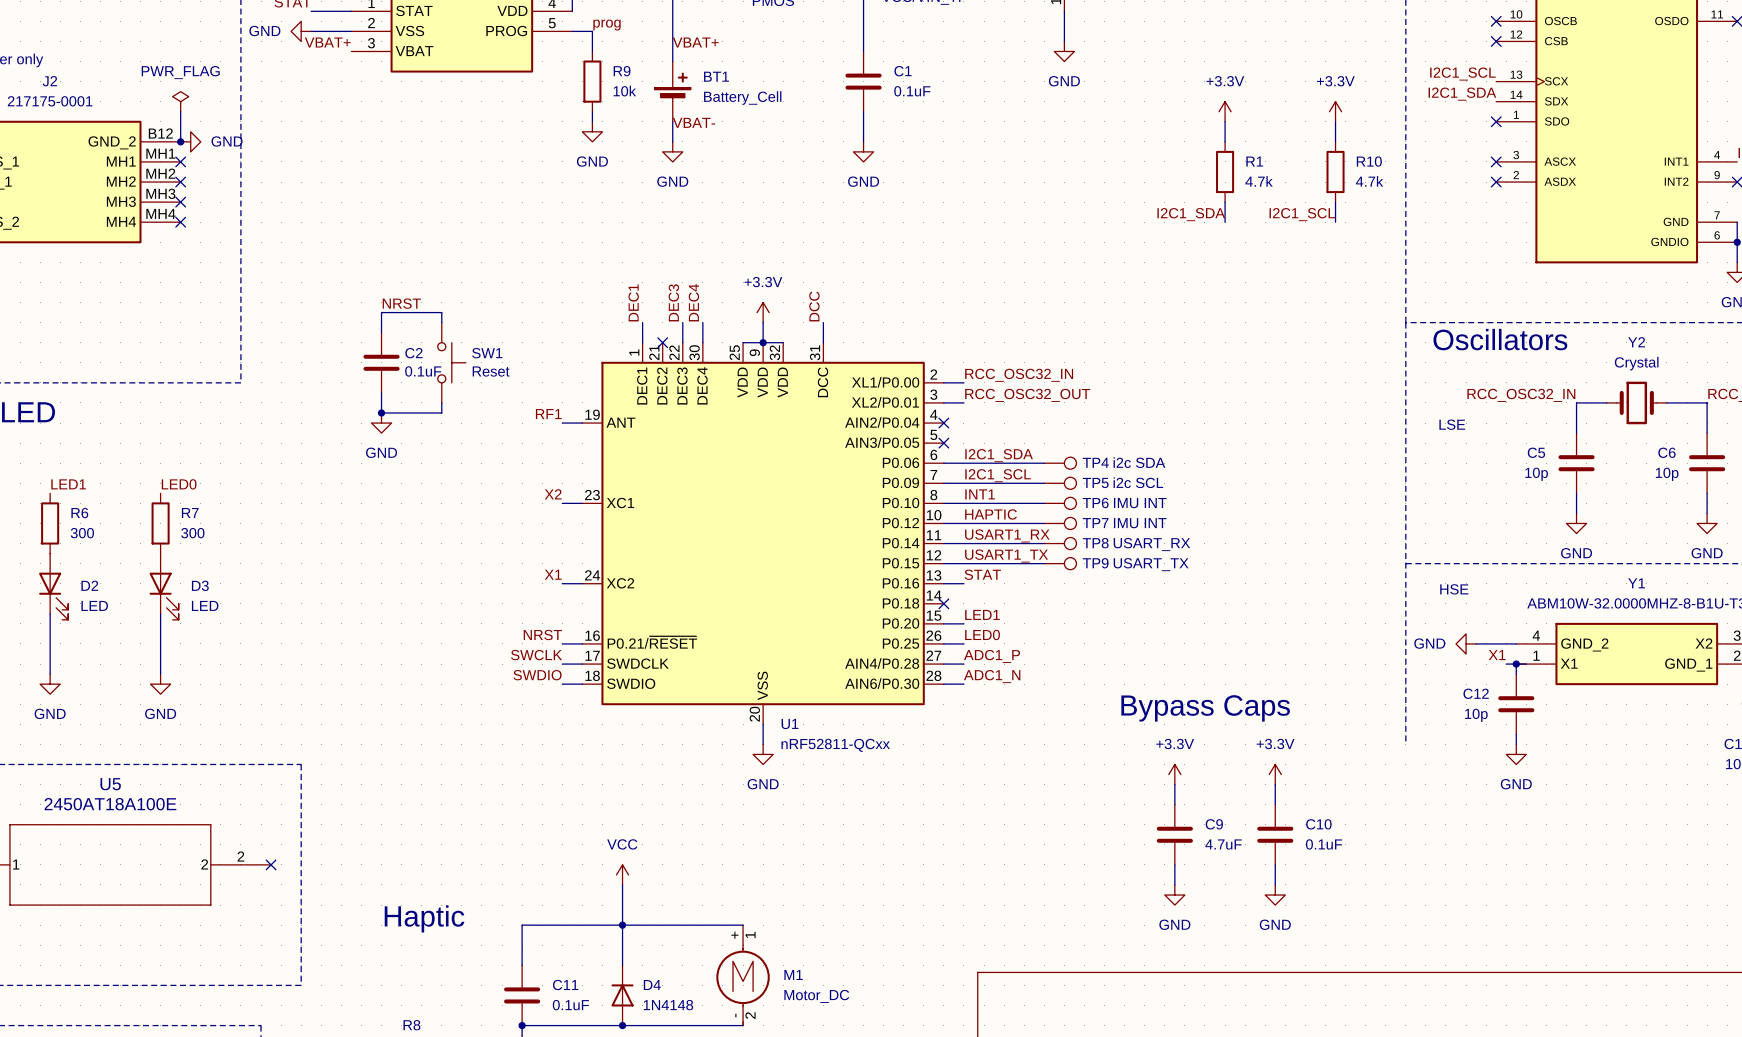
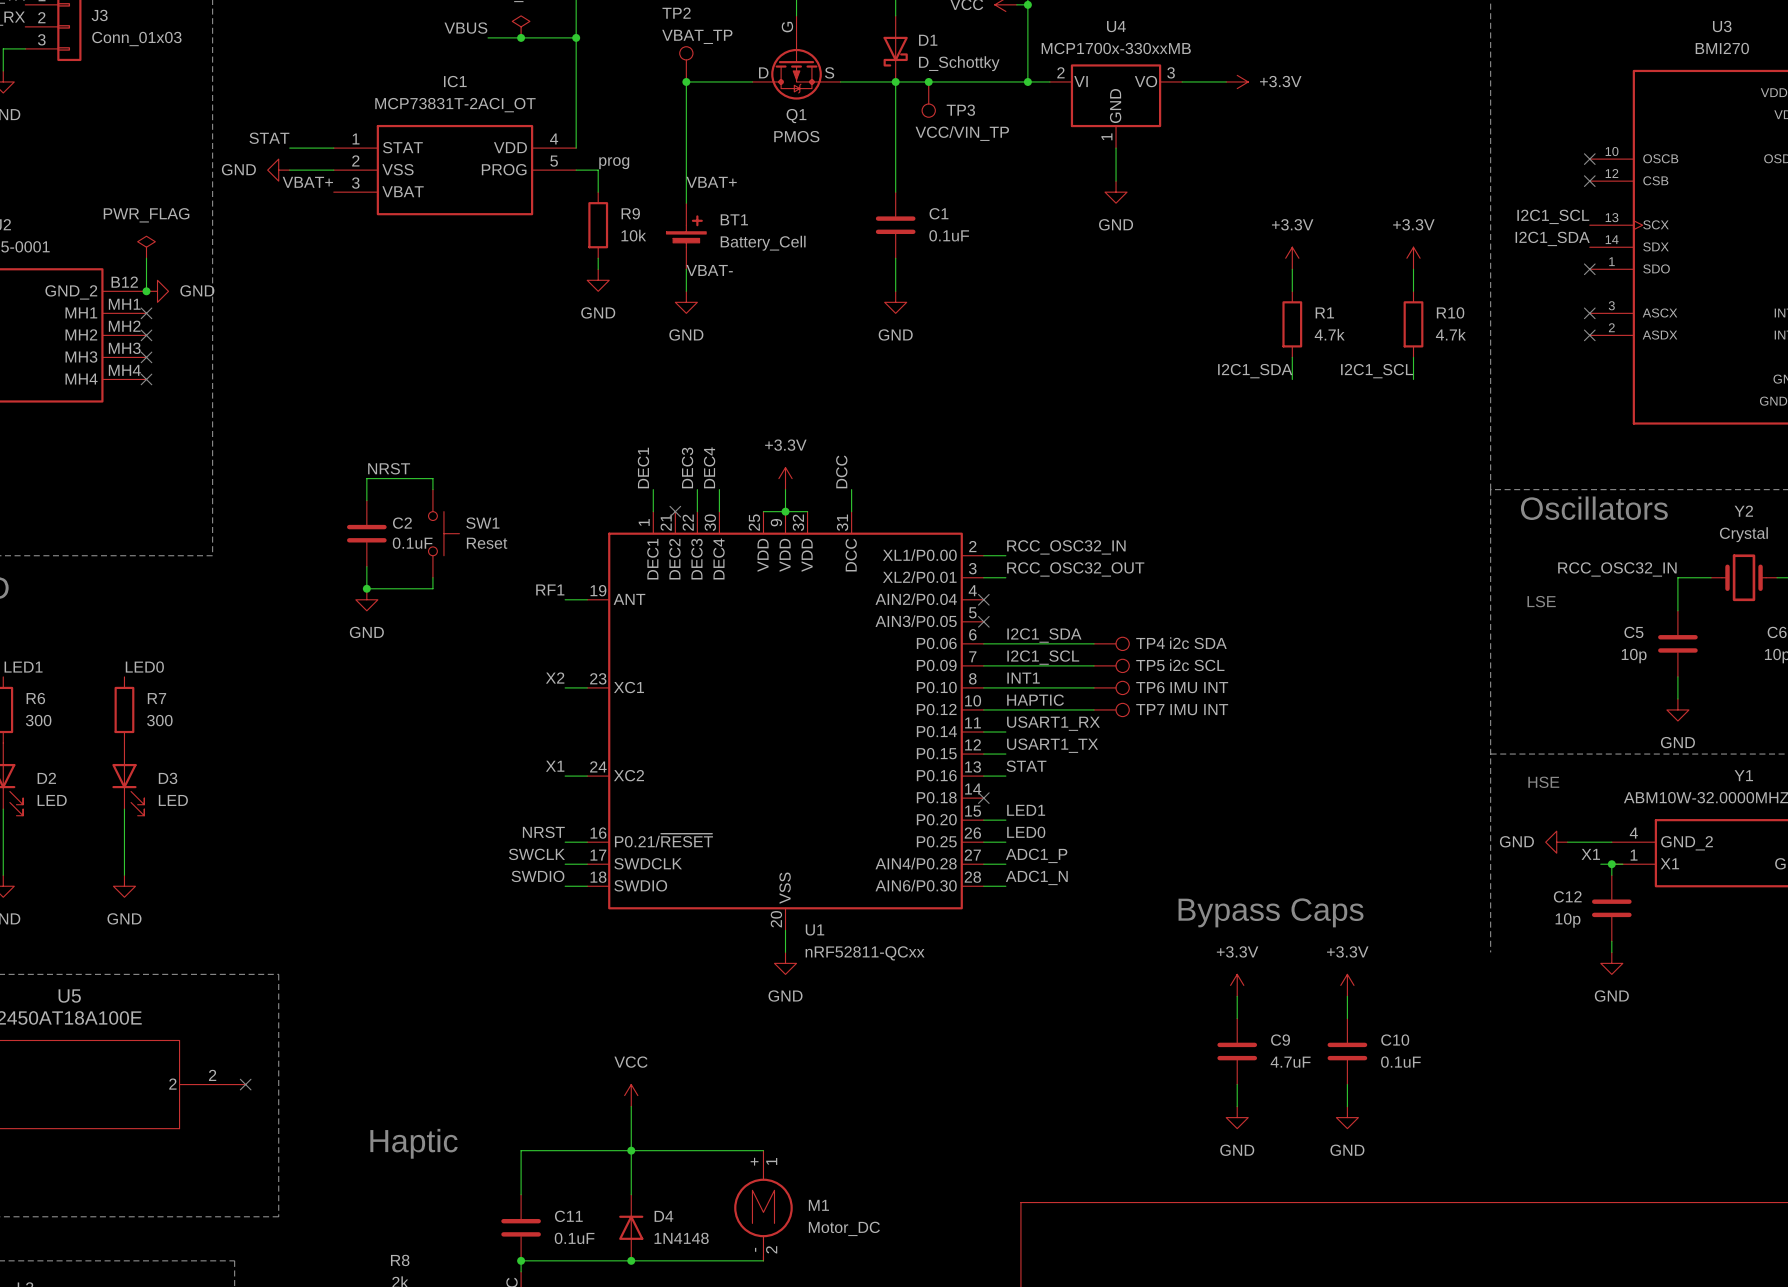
wire: (963, 543) (1044, 543) -> none
TP8: USART_RX (1060, 543) -> none
wire: (963, 563) (1044, 563) -> none
TP9: USART_TX (1060, 563) -> none

